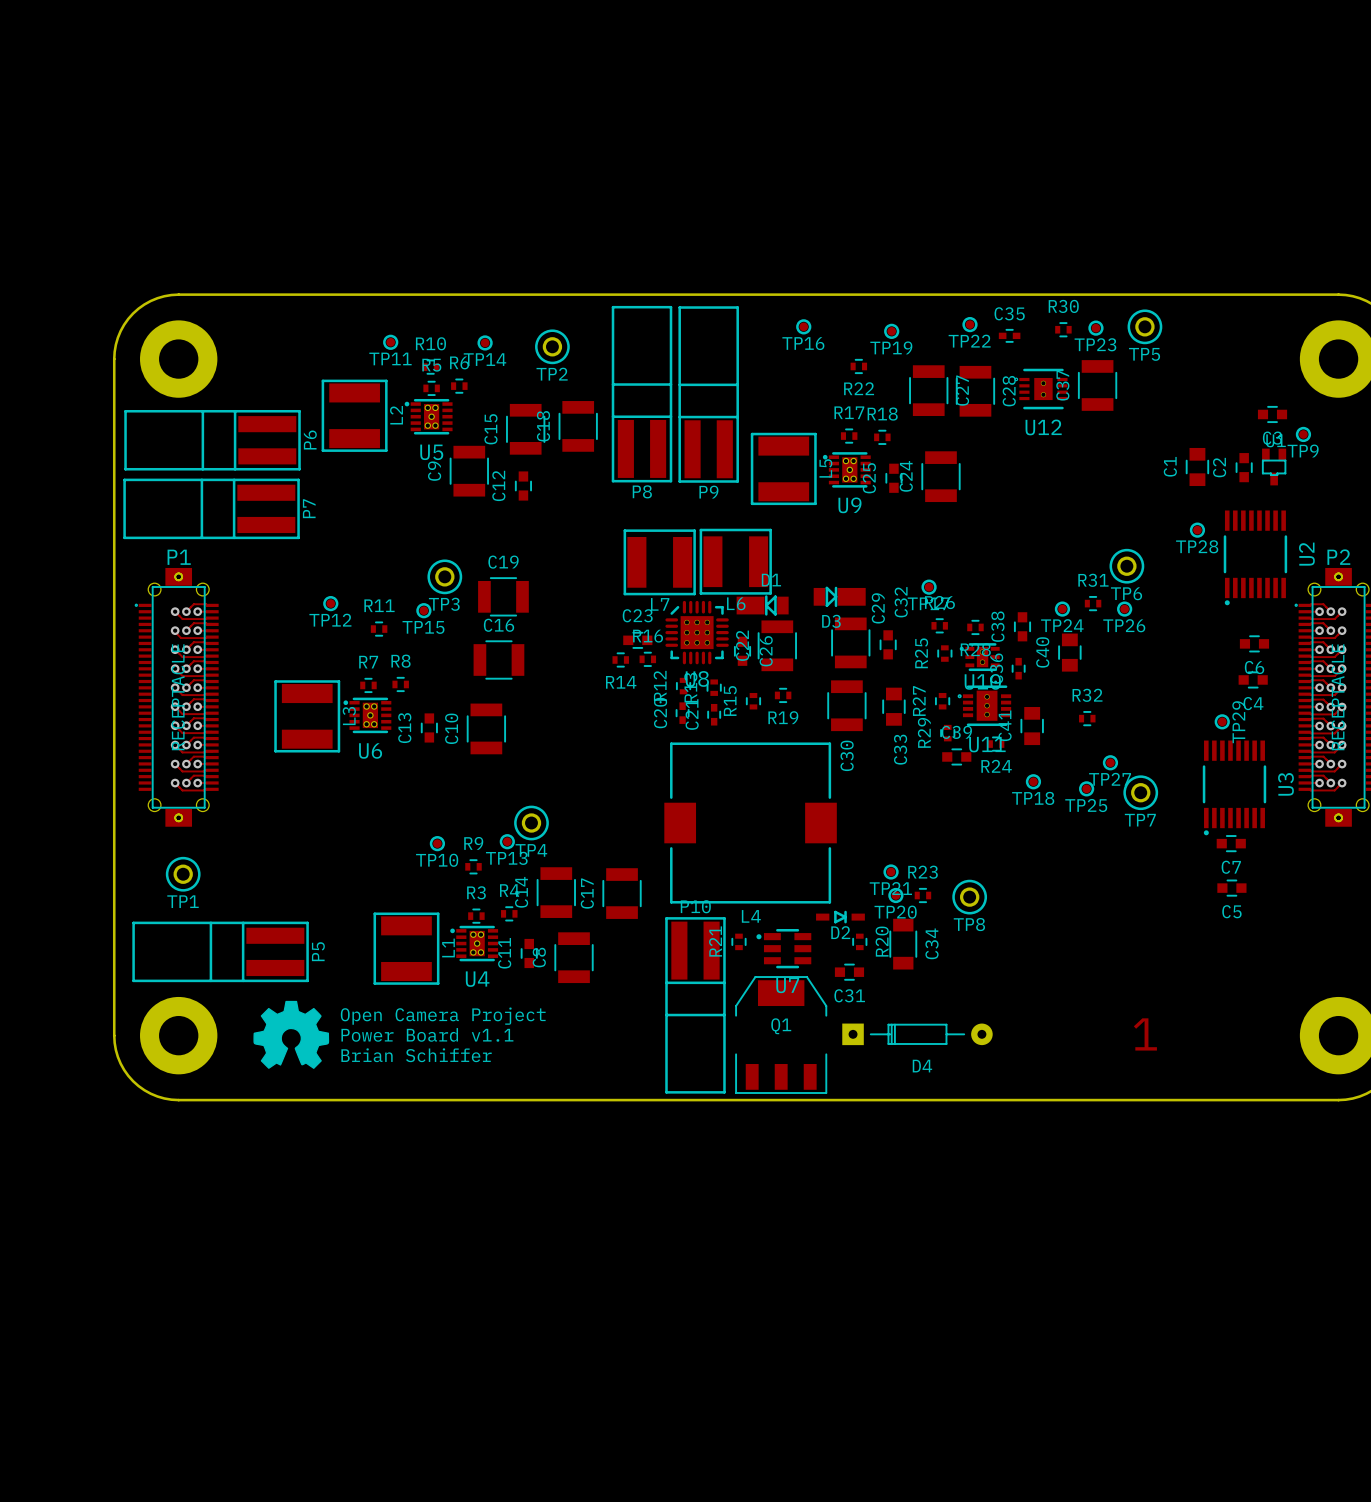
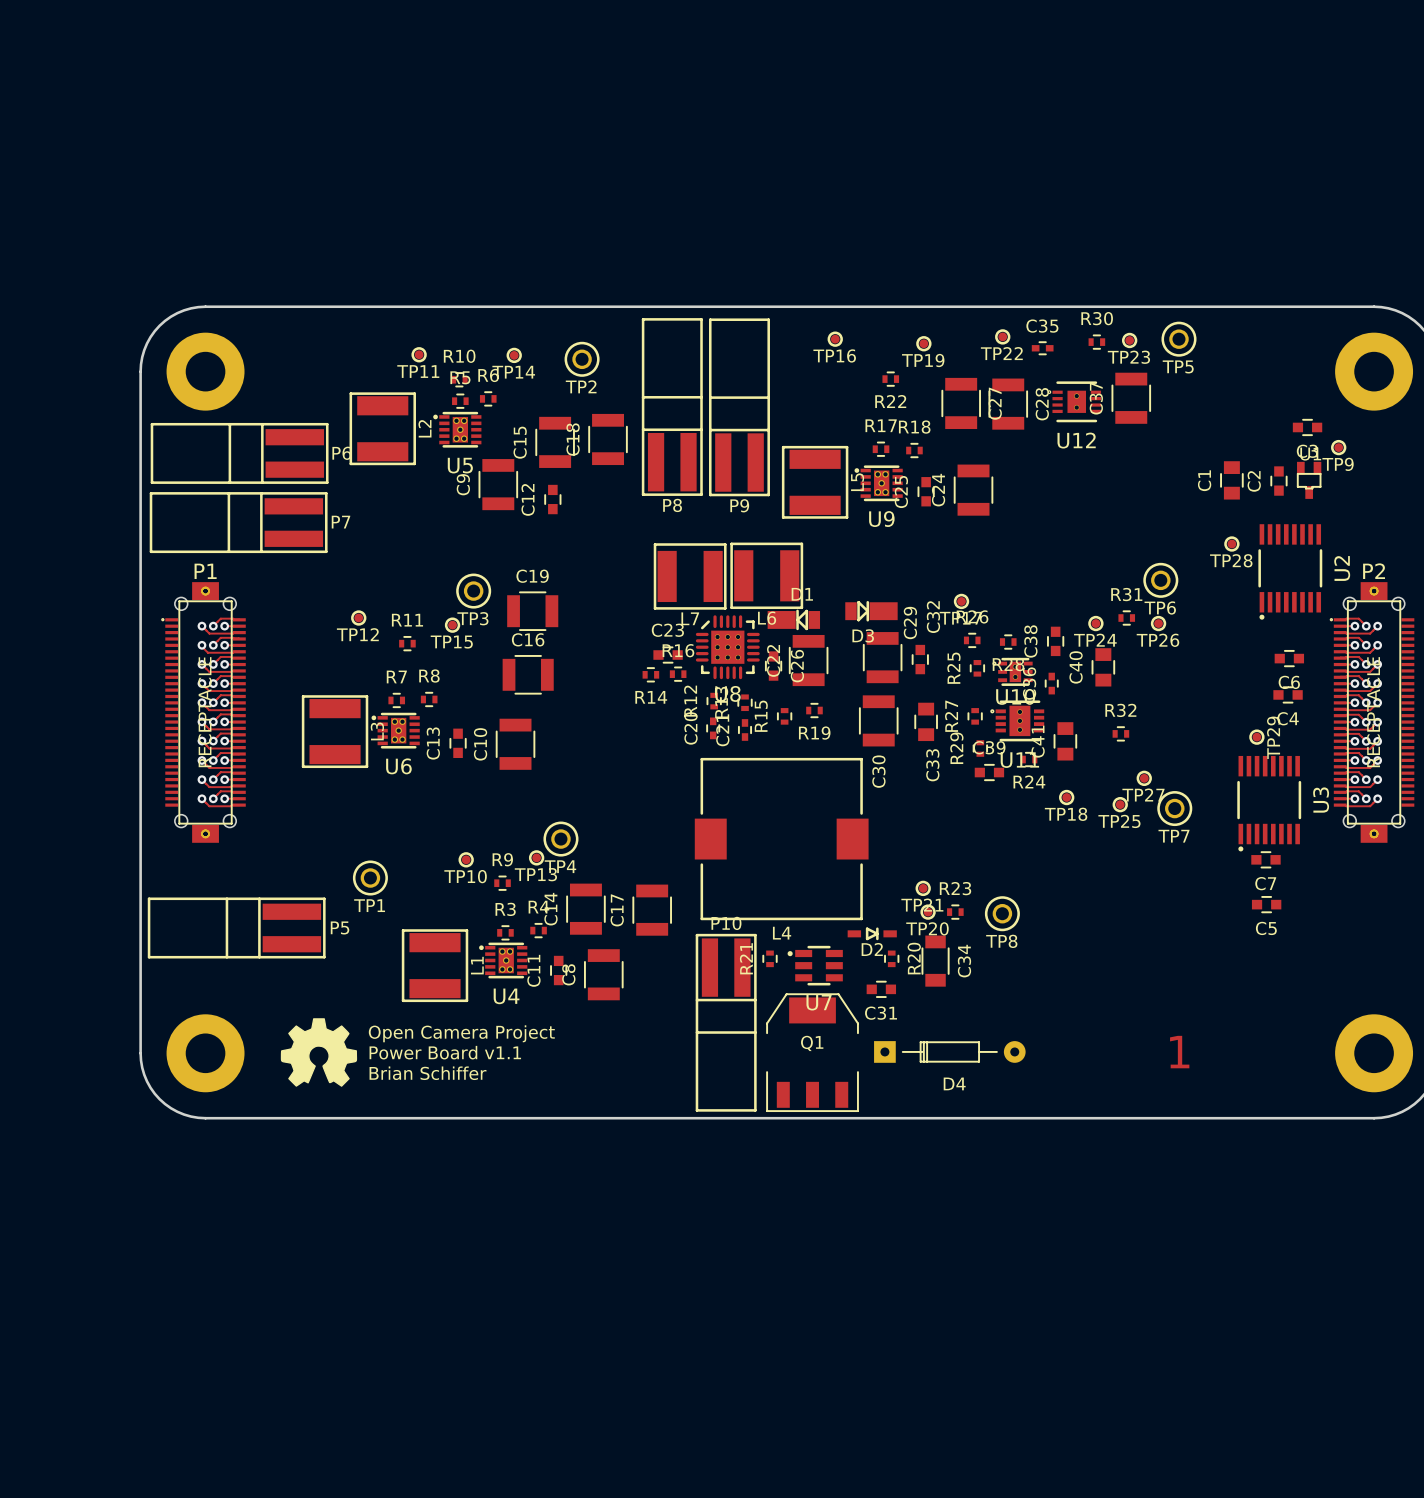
P6 name rotation: 0° (310, 440) -> 90° clockwise (341, 453)
P7 name rotation: 0° (309, 508) -> 90° clockwise (341, 522)
TP1 position: (183, 874) -> (370, 878)
P5 position: (220, 951) -> (236, 927)
P5 name rotation: 0° (318, 951) -> 90° clockwise (340, 927)

